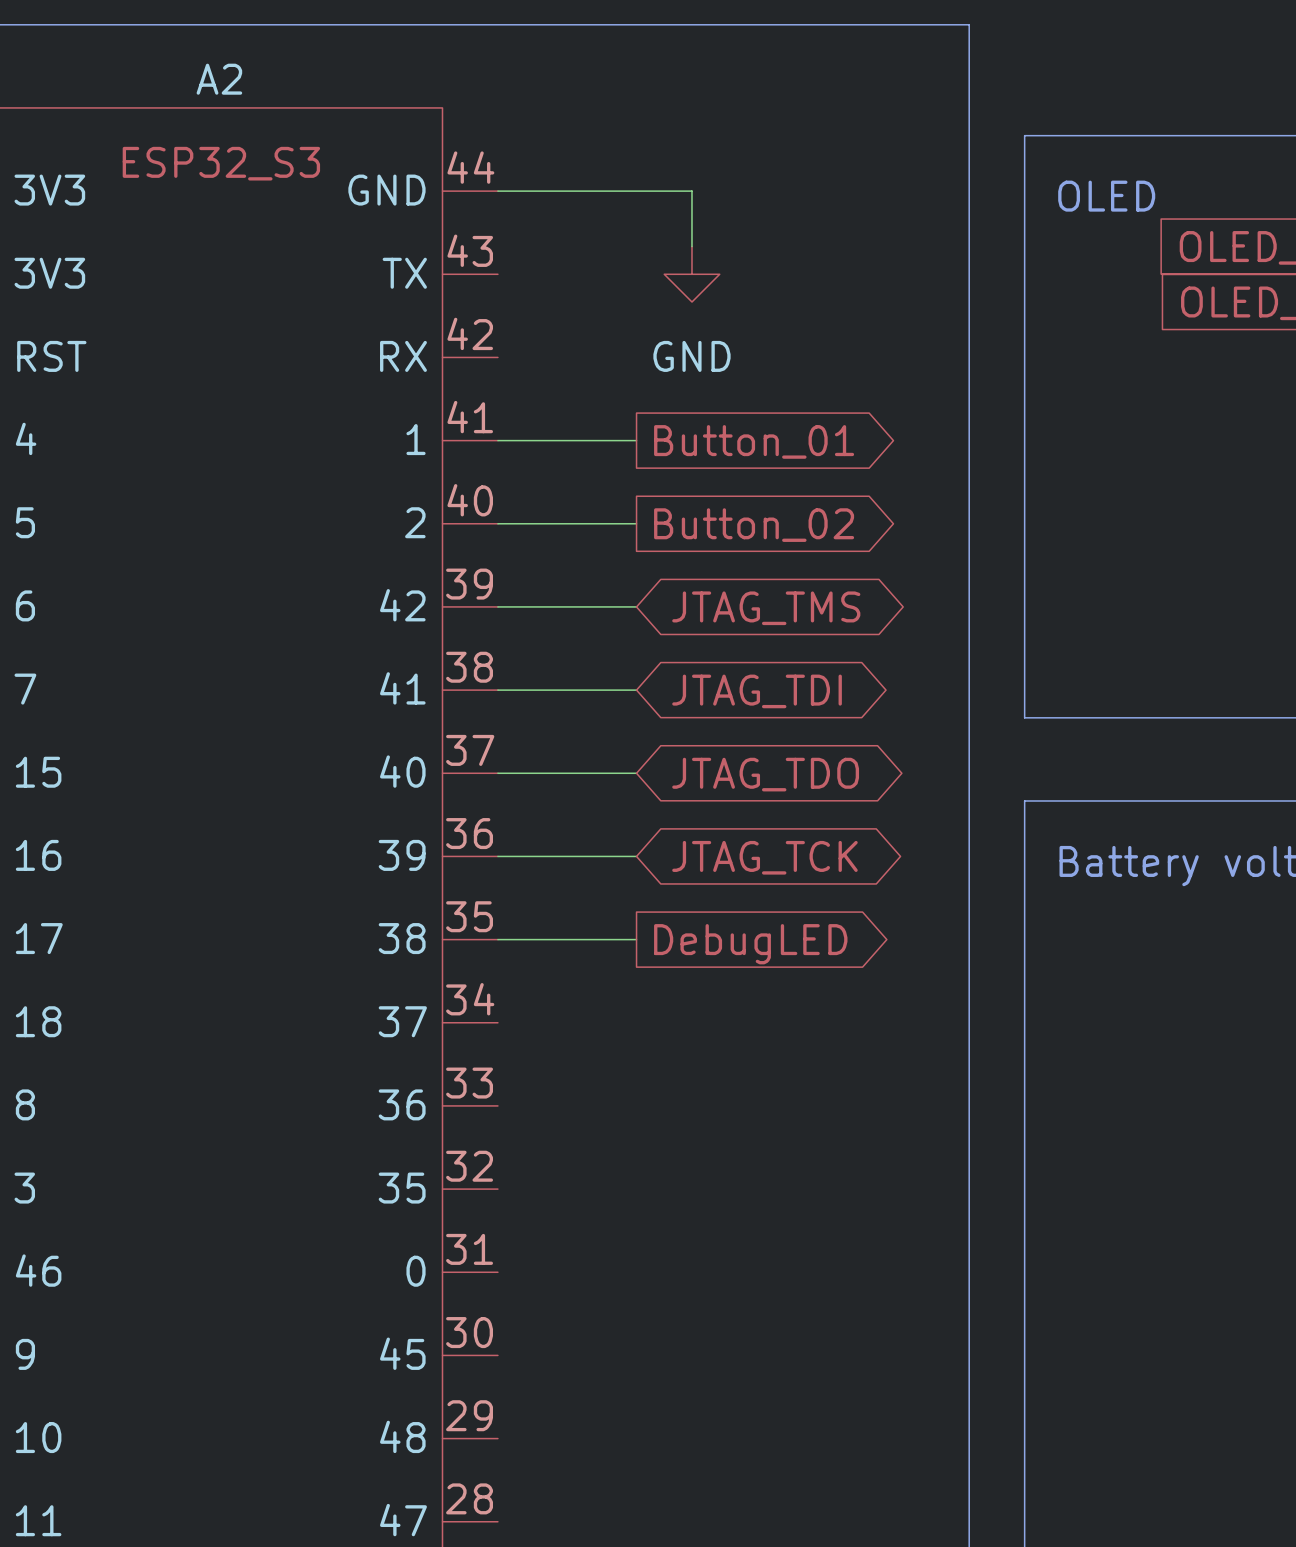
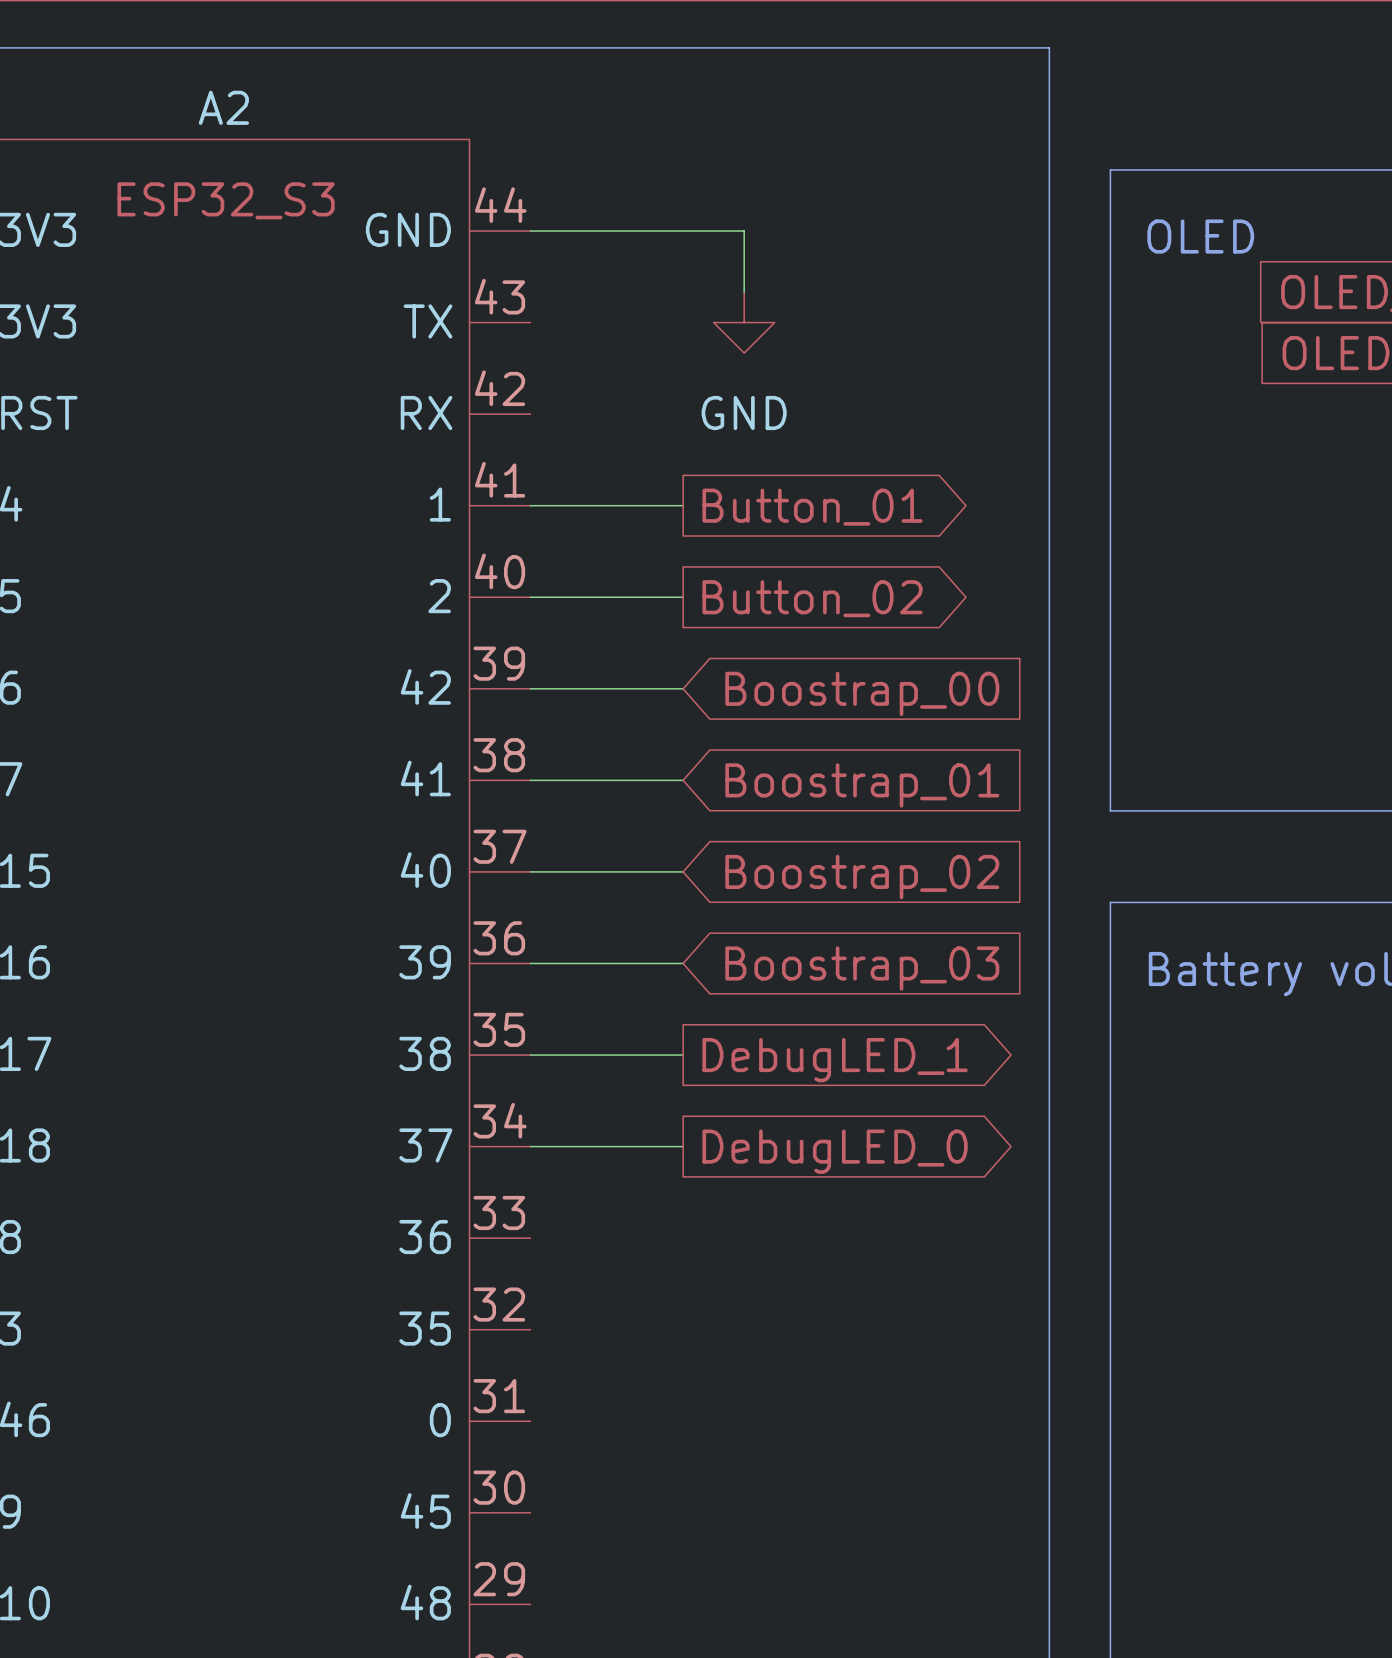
global label shape: bidirectional (766, 608) -> input (862, 693)
global label: JTAG_TMS (766, 608) -> Boostrap_00 (862, 693)
global label shape: bidirectional (757, 691) -> input (862, 785)
global label: JTAG_TDI (757, 691) -> Boostrap_01 (862, 785)
global label shape: bidirectional (765, 774) -> input (862, 877)
global label: JTAG_TDO (765, 774) -> Boostrap_02 (862, 877)
global label shape: bidirectional (764, 857) -> input (862, 968)
global label: JTAG_TCK (764, 857) -> Boostrap_03 (862, 968)
global label: DebugLED (750, 944) -> DebugLED_1 (835, 1060)
wire: none -> (530, 1146) (683, 1146)
global label: none -> DebugLED_0 (835, 1151)

